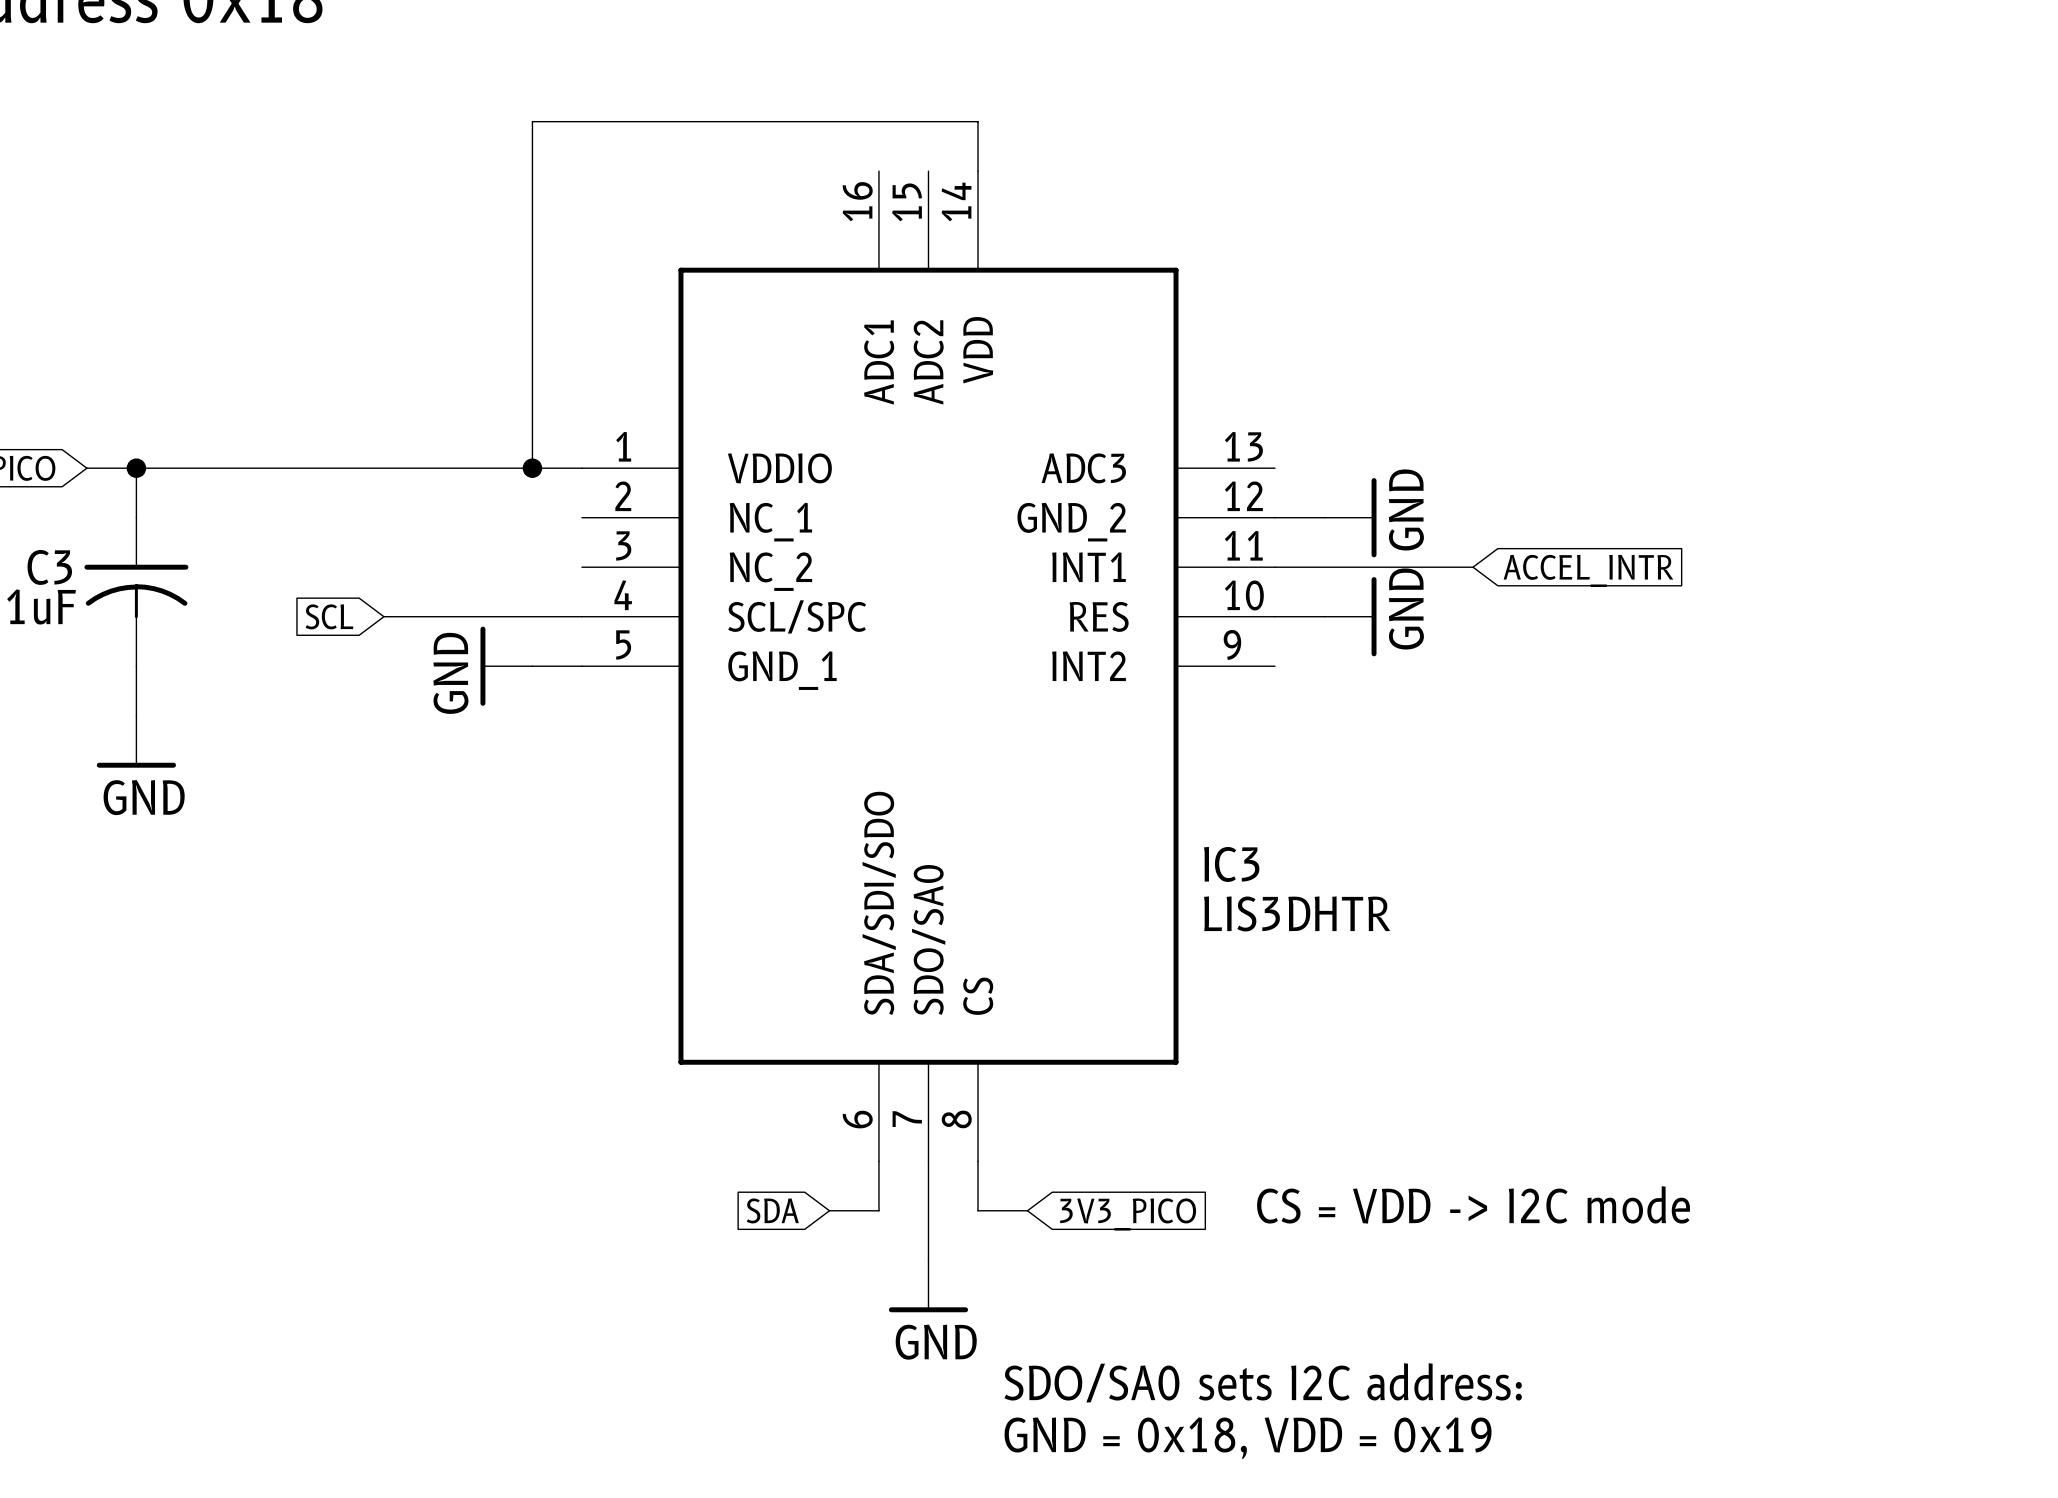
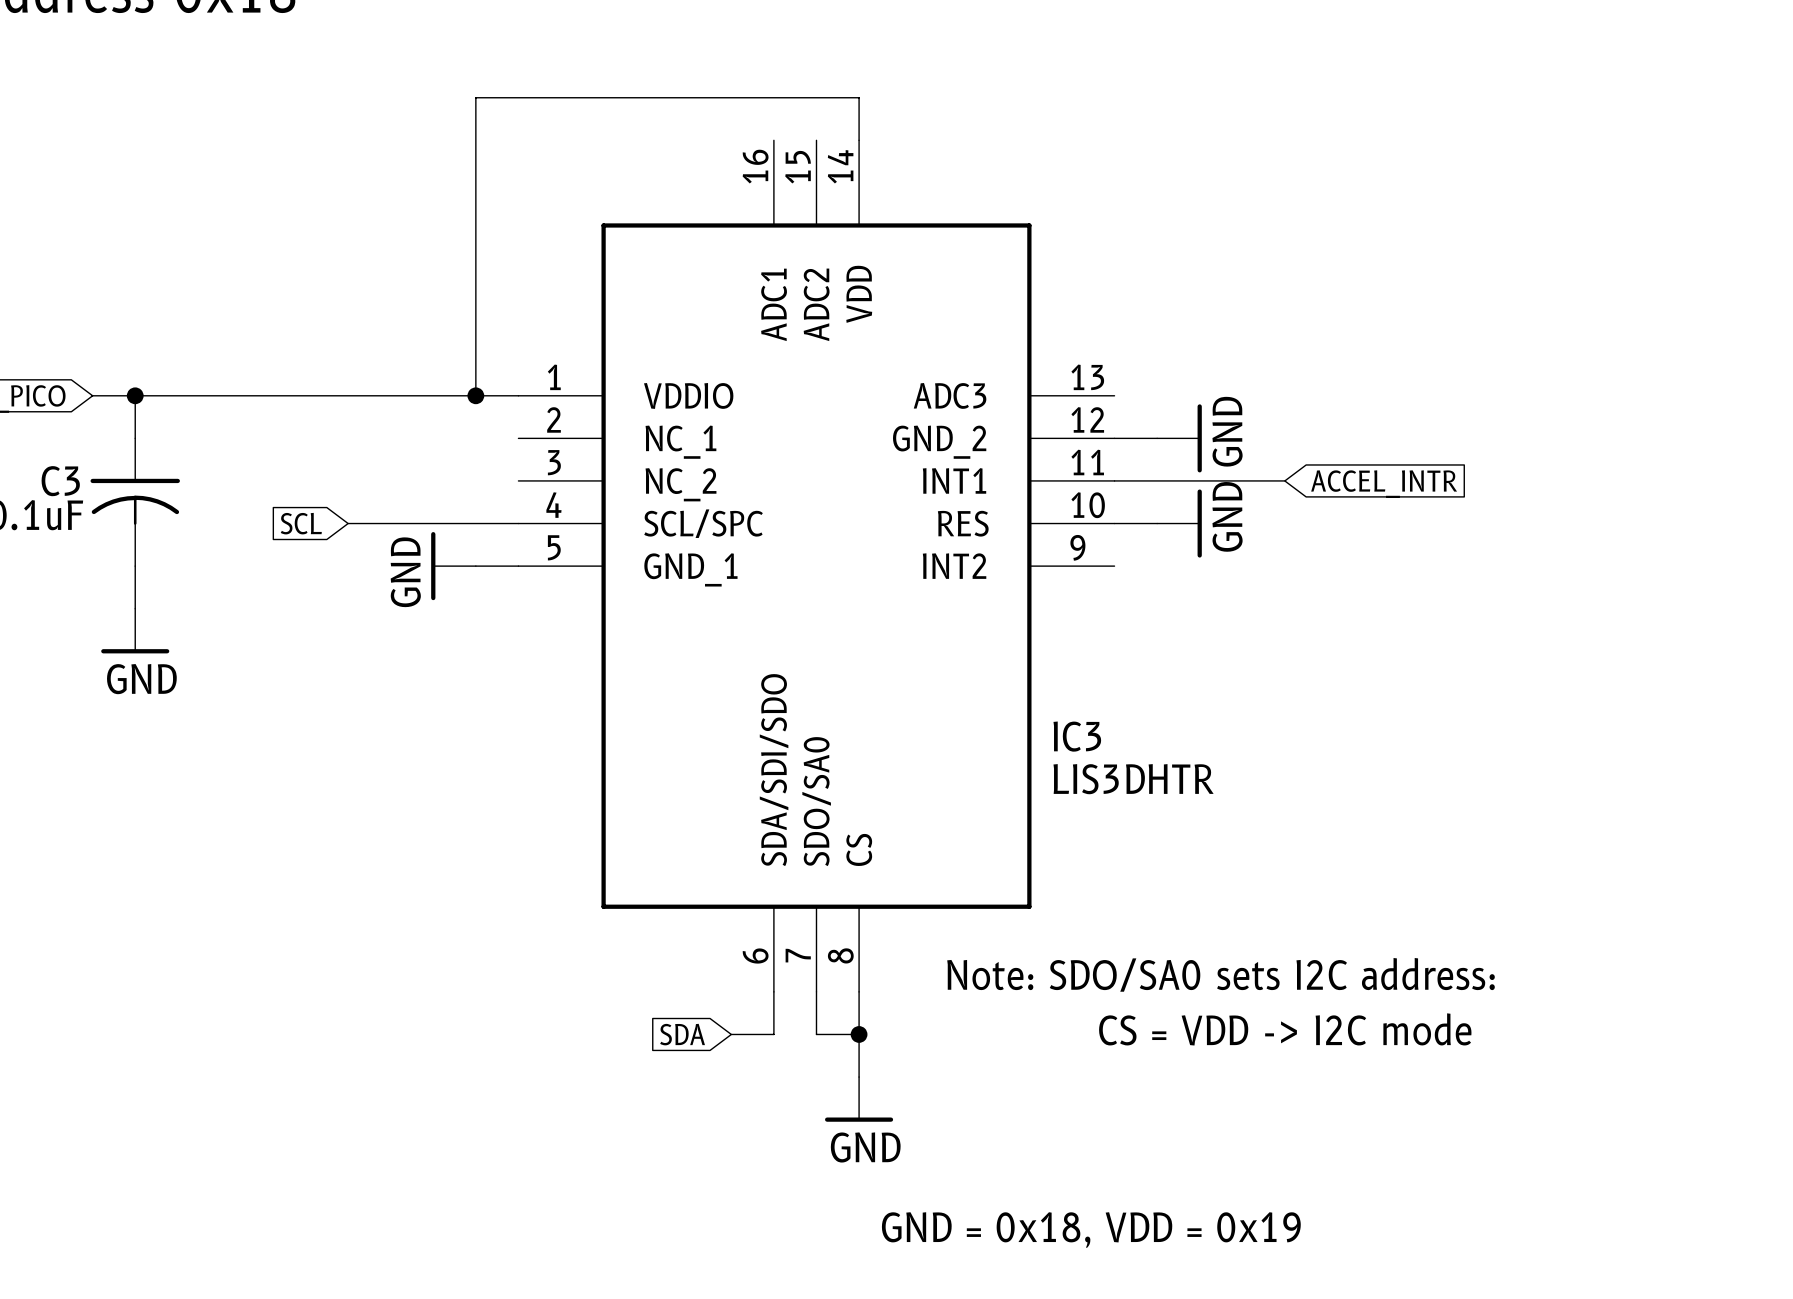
text: none -> Note: SDO/SA0 sets I2C address: (1221, 974)
wire: (928, 1210) (928, 1260) -> (816, 1034) (859, 1034) (859, 1077)
wire: (977, 1210) (1027, 1210) -> none
junction: none -> (859, 1034)
global label: 3V3_PICO (1128, 1214) -> none
power symbol position: GND (928, 1286) -> GND (859, 1099)
text: SDO/SA0 sets I2C address: (1263, 1382) -> none

